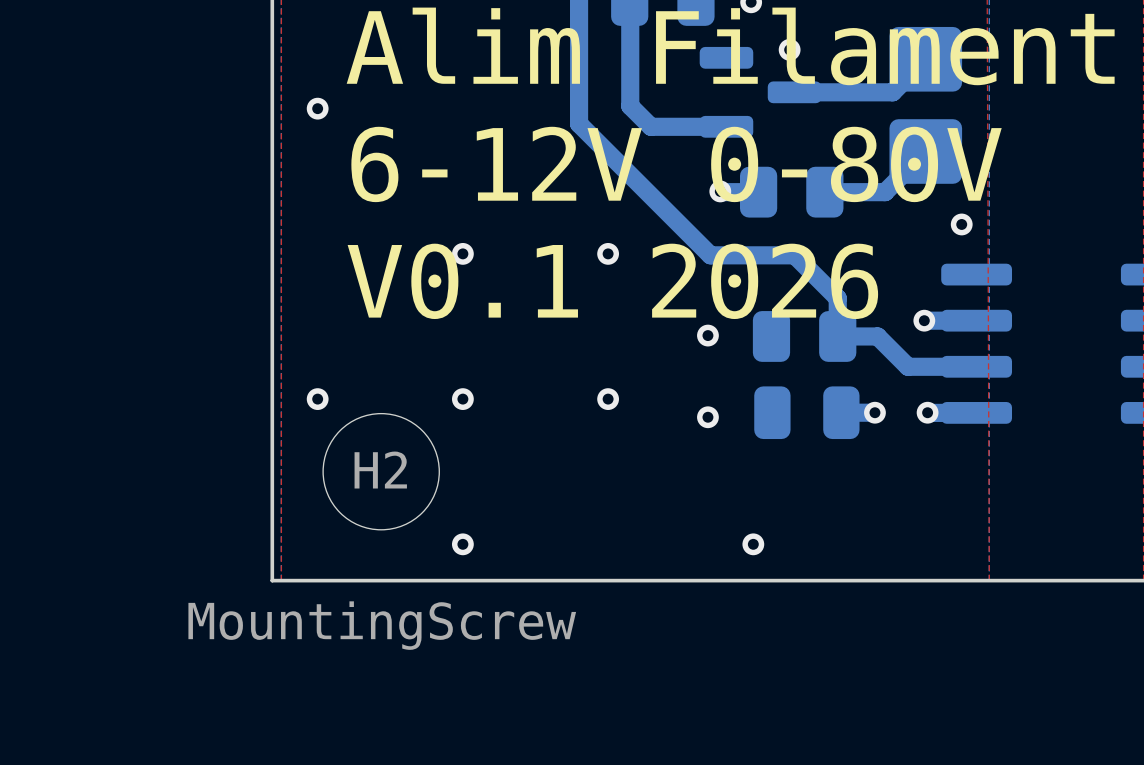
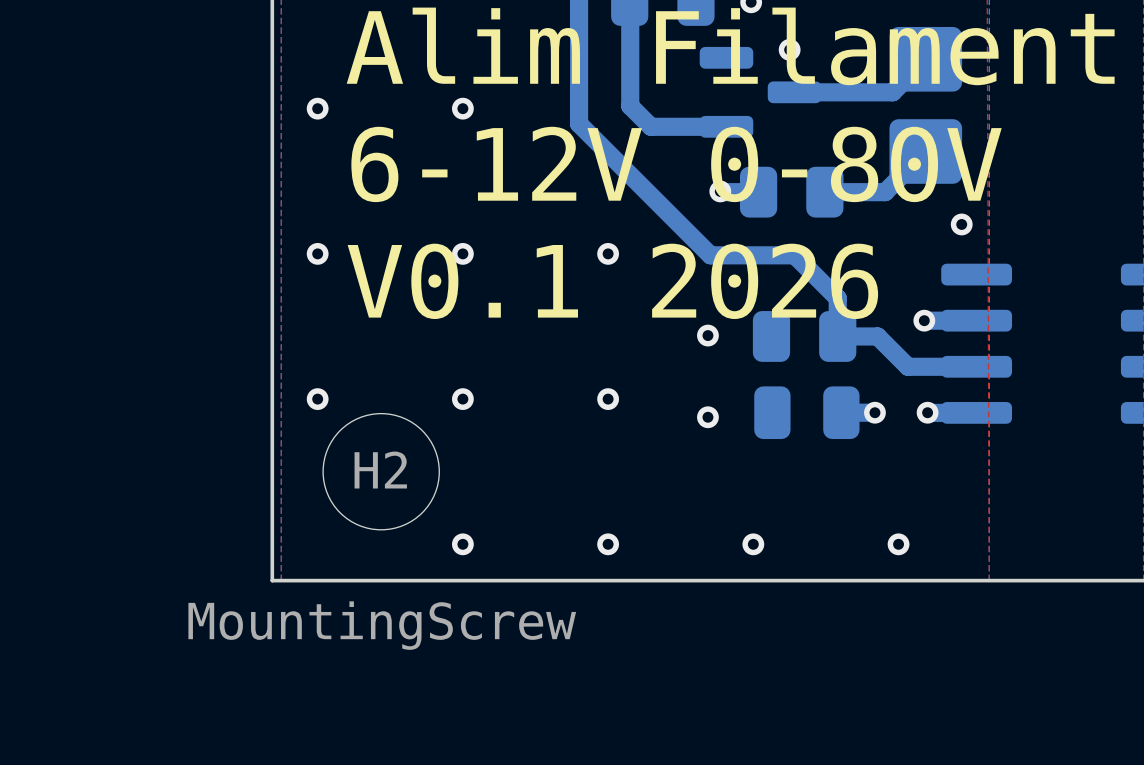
via: none -> (462, 108)
via: none -> (317, 253)
via: none -> (608, 544)
via: none -> (898, 544)

